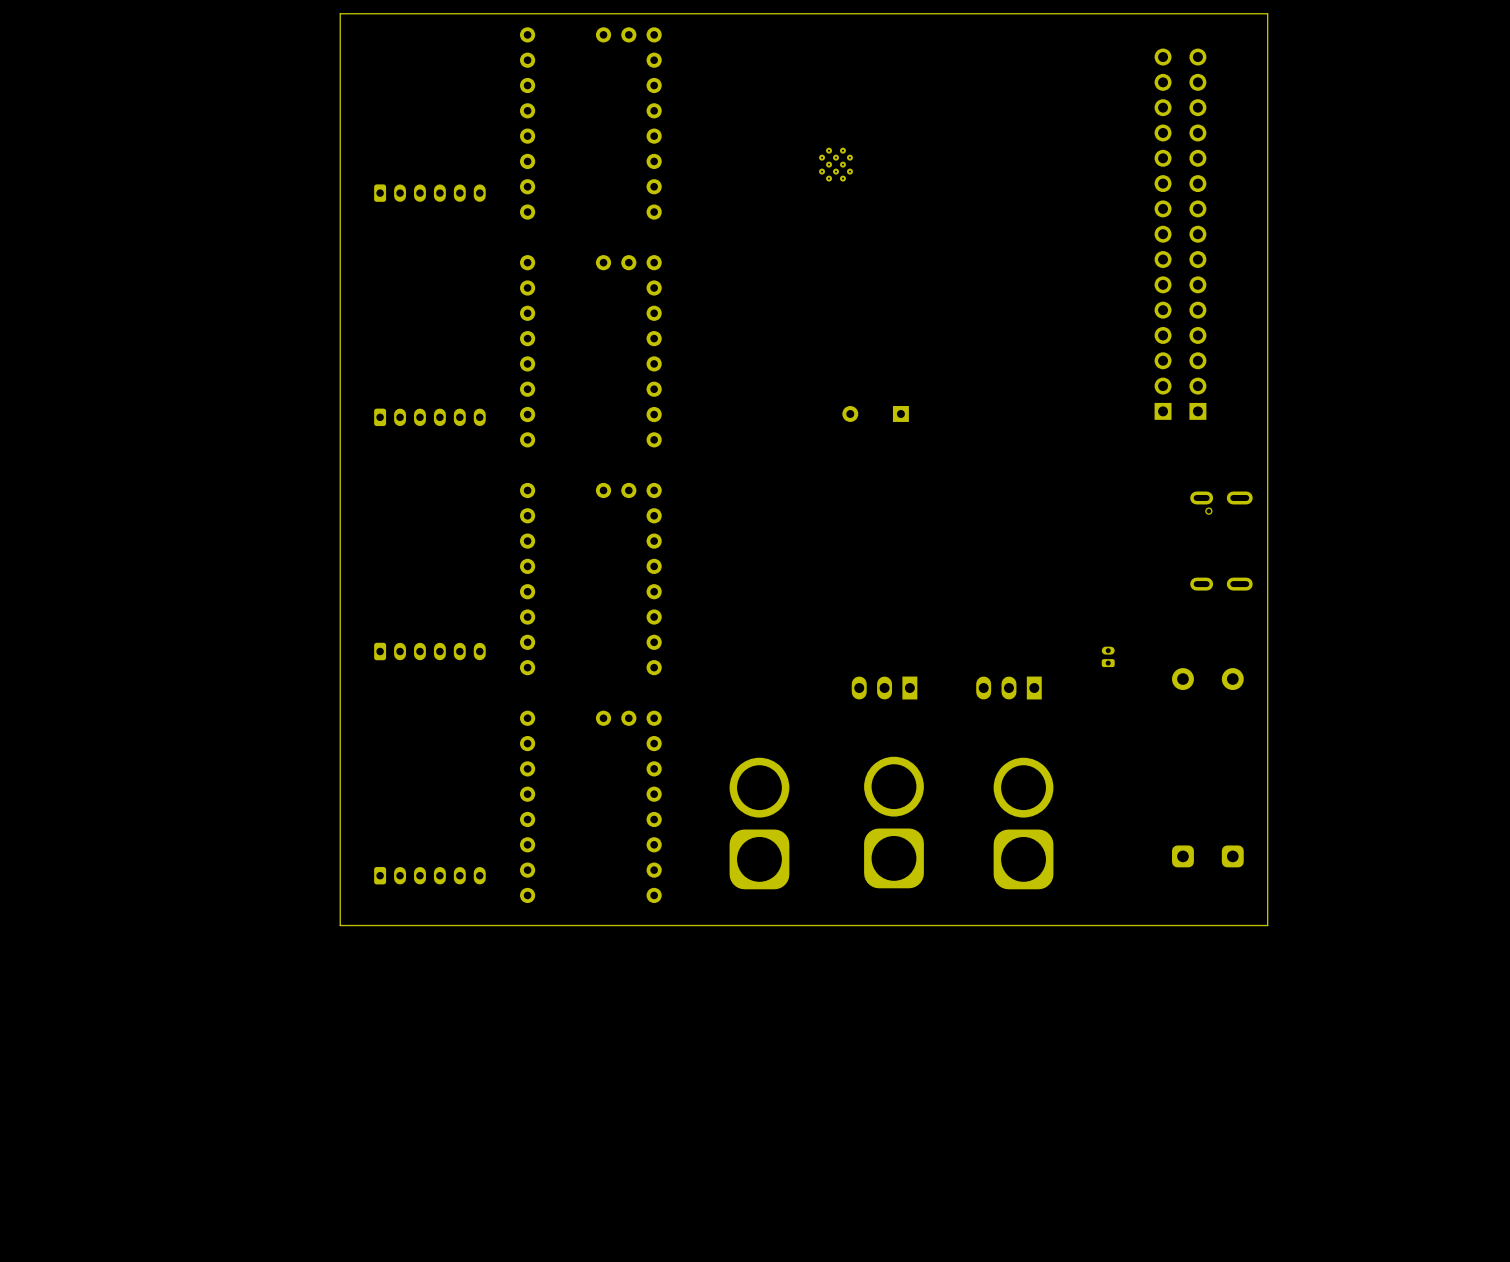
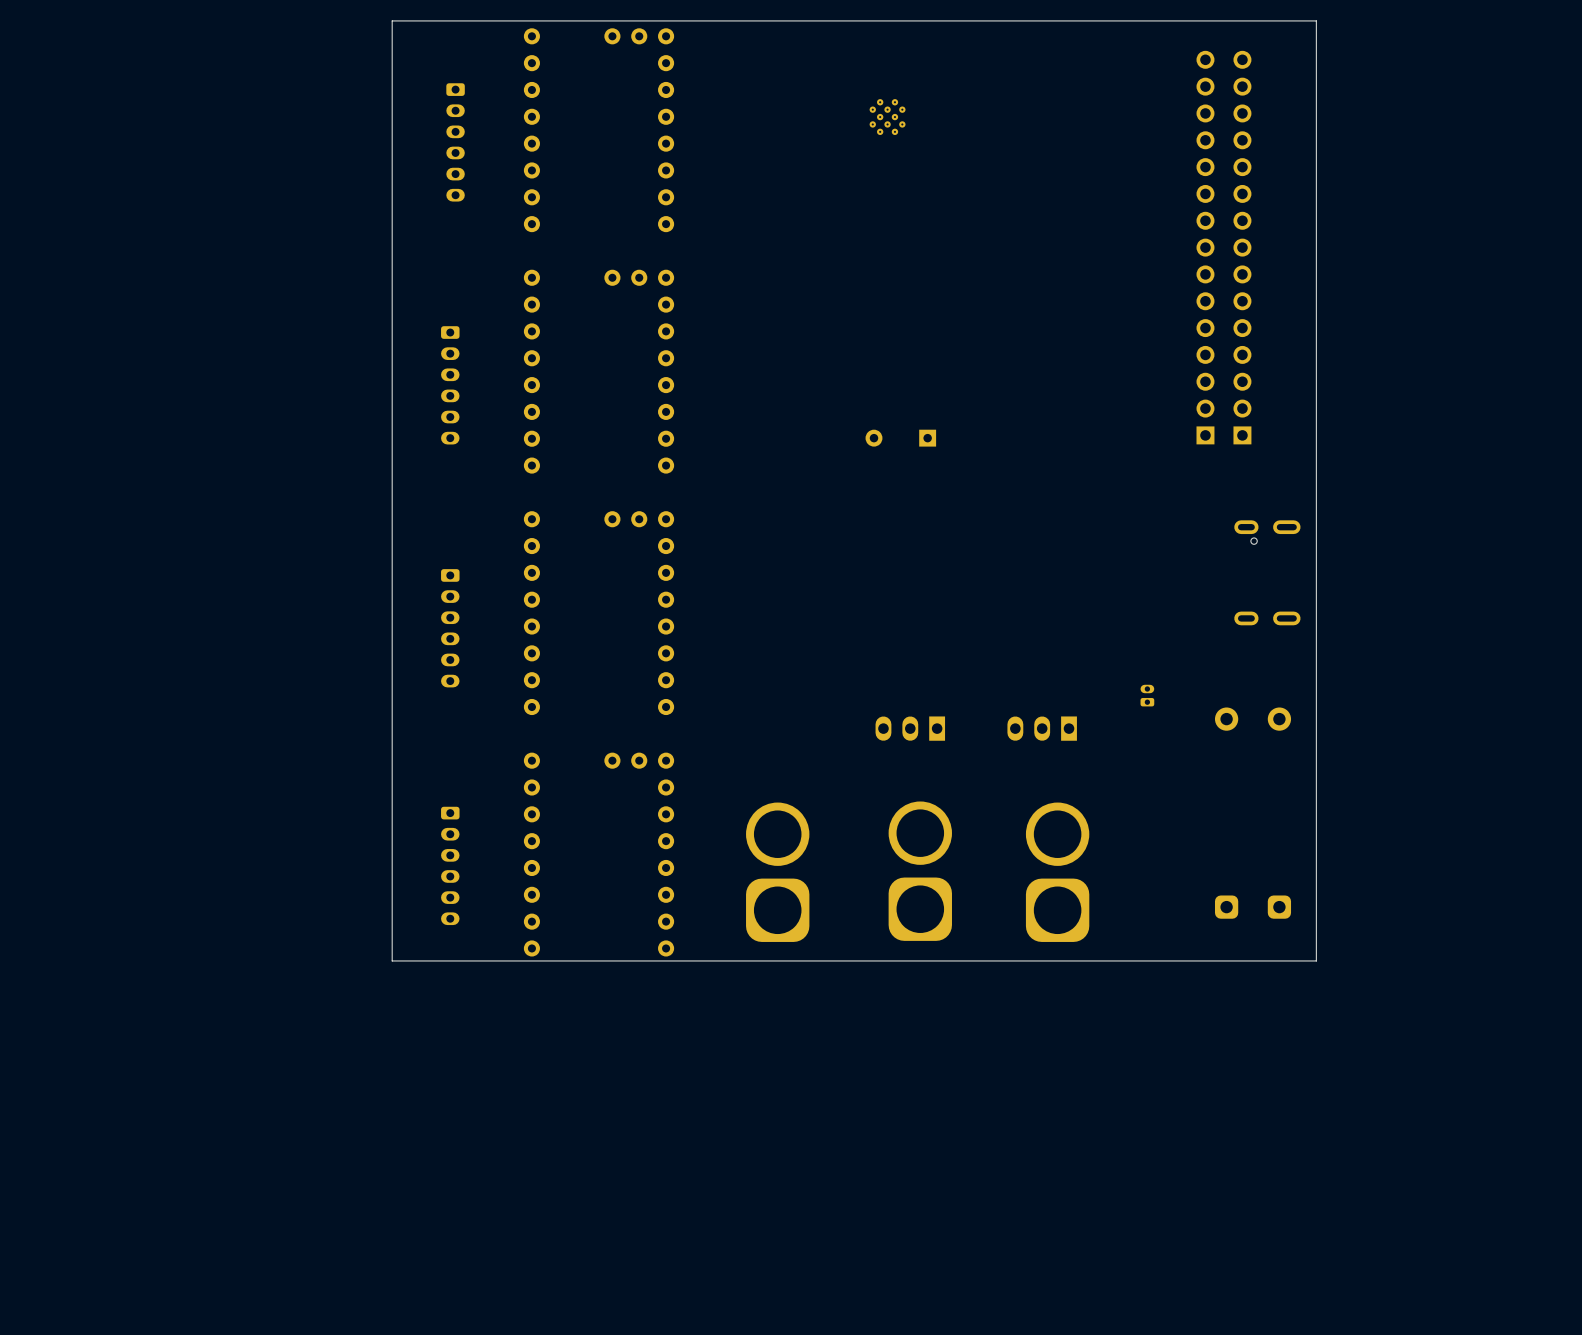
board edge: (1267, 20) (1267, 13) (340, 13) (340, 925) (1267, 925) (1267, 907) -> (1316, 20) (392, 20) (392, 960) (1316, 960)
part position: (835, 164) -> (887, 117)
part rotation: 0° (429, 193) -> 90° clockwise (455, 142)
part rotation: 0° (429, 417) -> 90° clockwise (450, 385)
part rotation: 0° (429, 651) -> 90° clockwise (450, 628)
part rotation: 0° (429, 875) -> 90° clockwise (450, 865)

